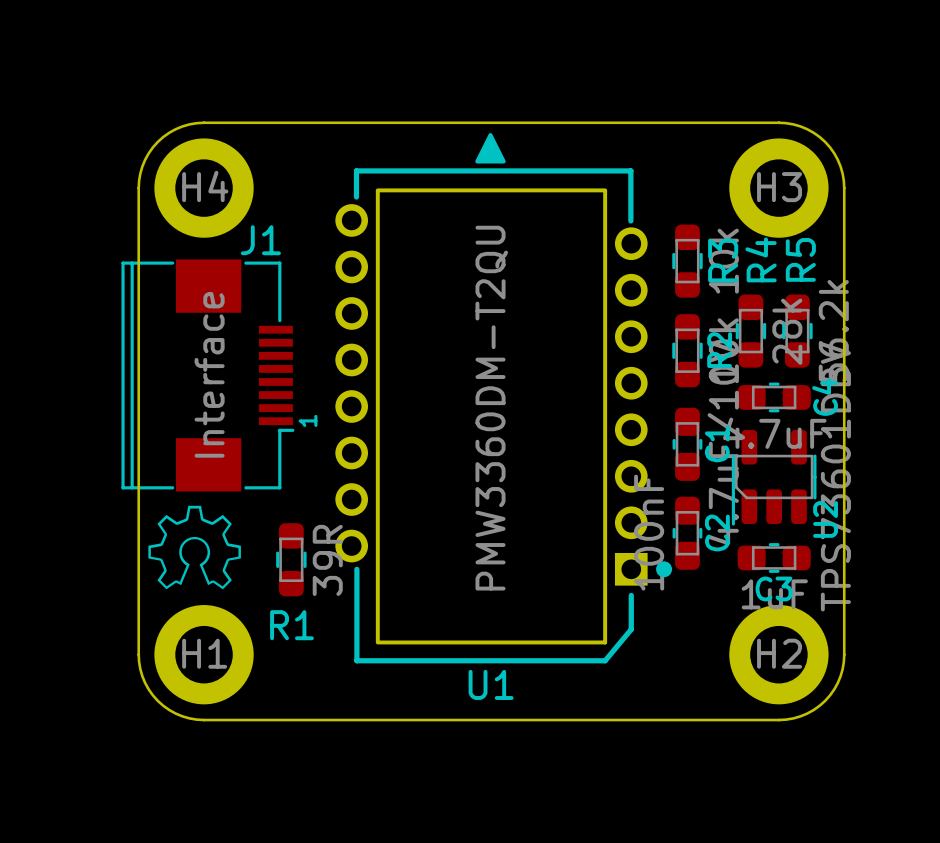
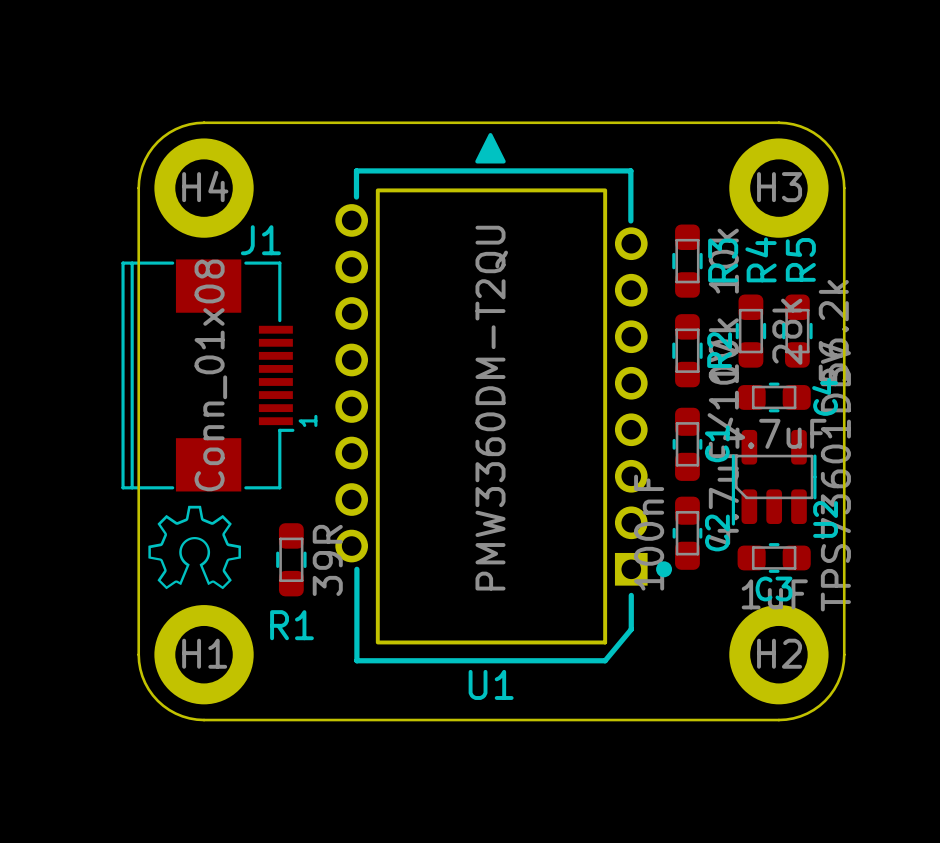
J1 value: Interface (209, 374) -> Conn_01x08 (210, 375)

